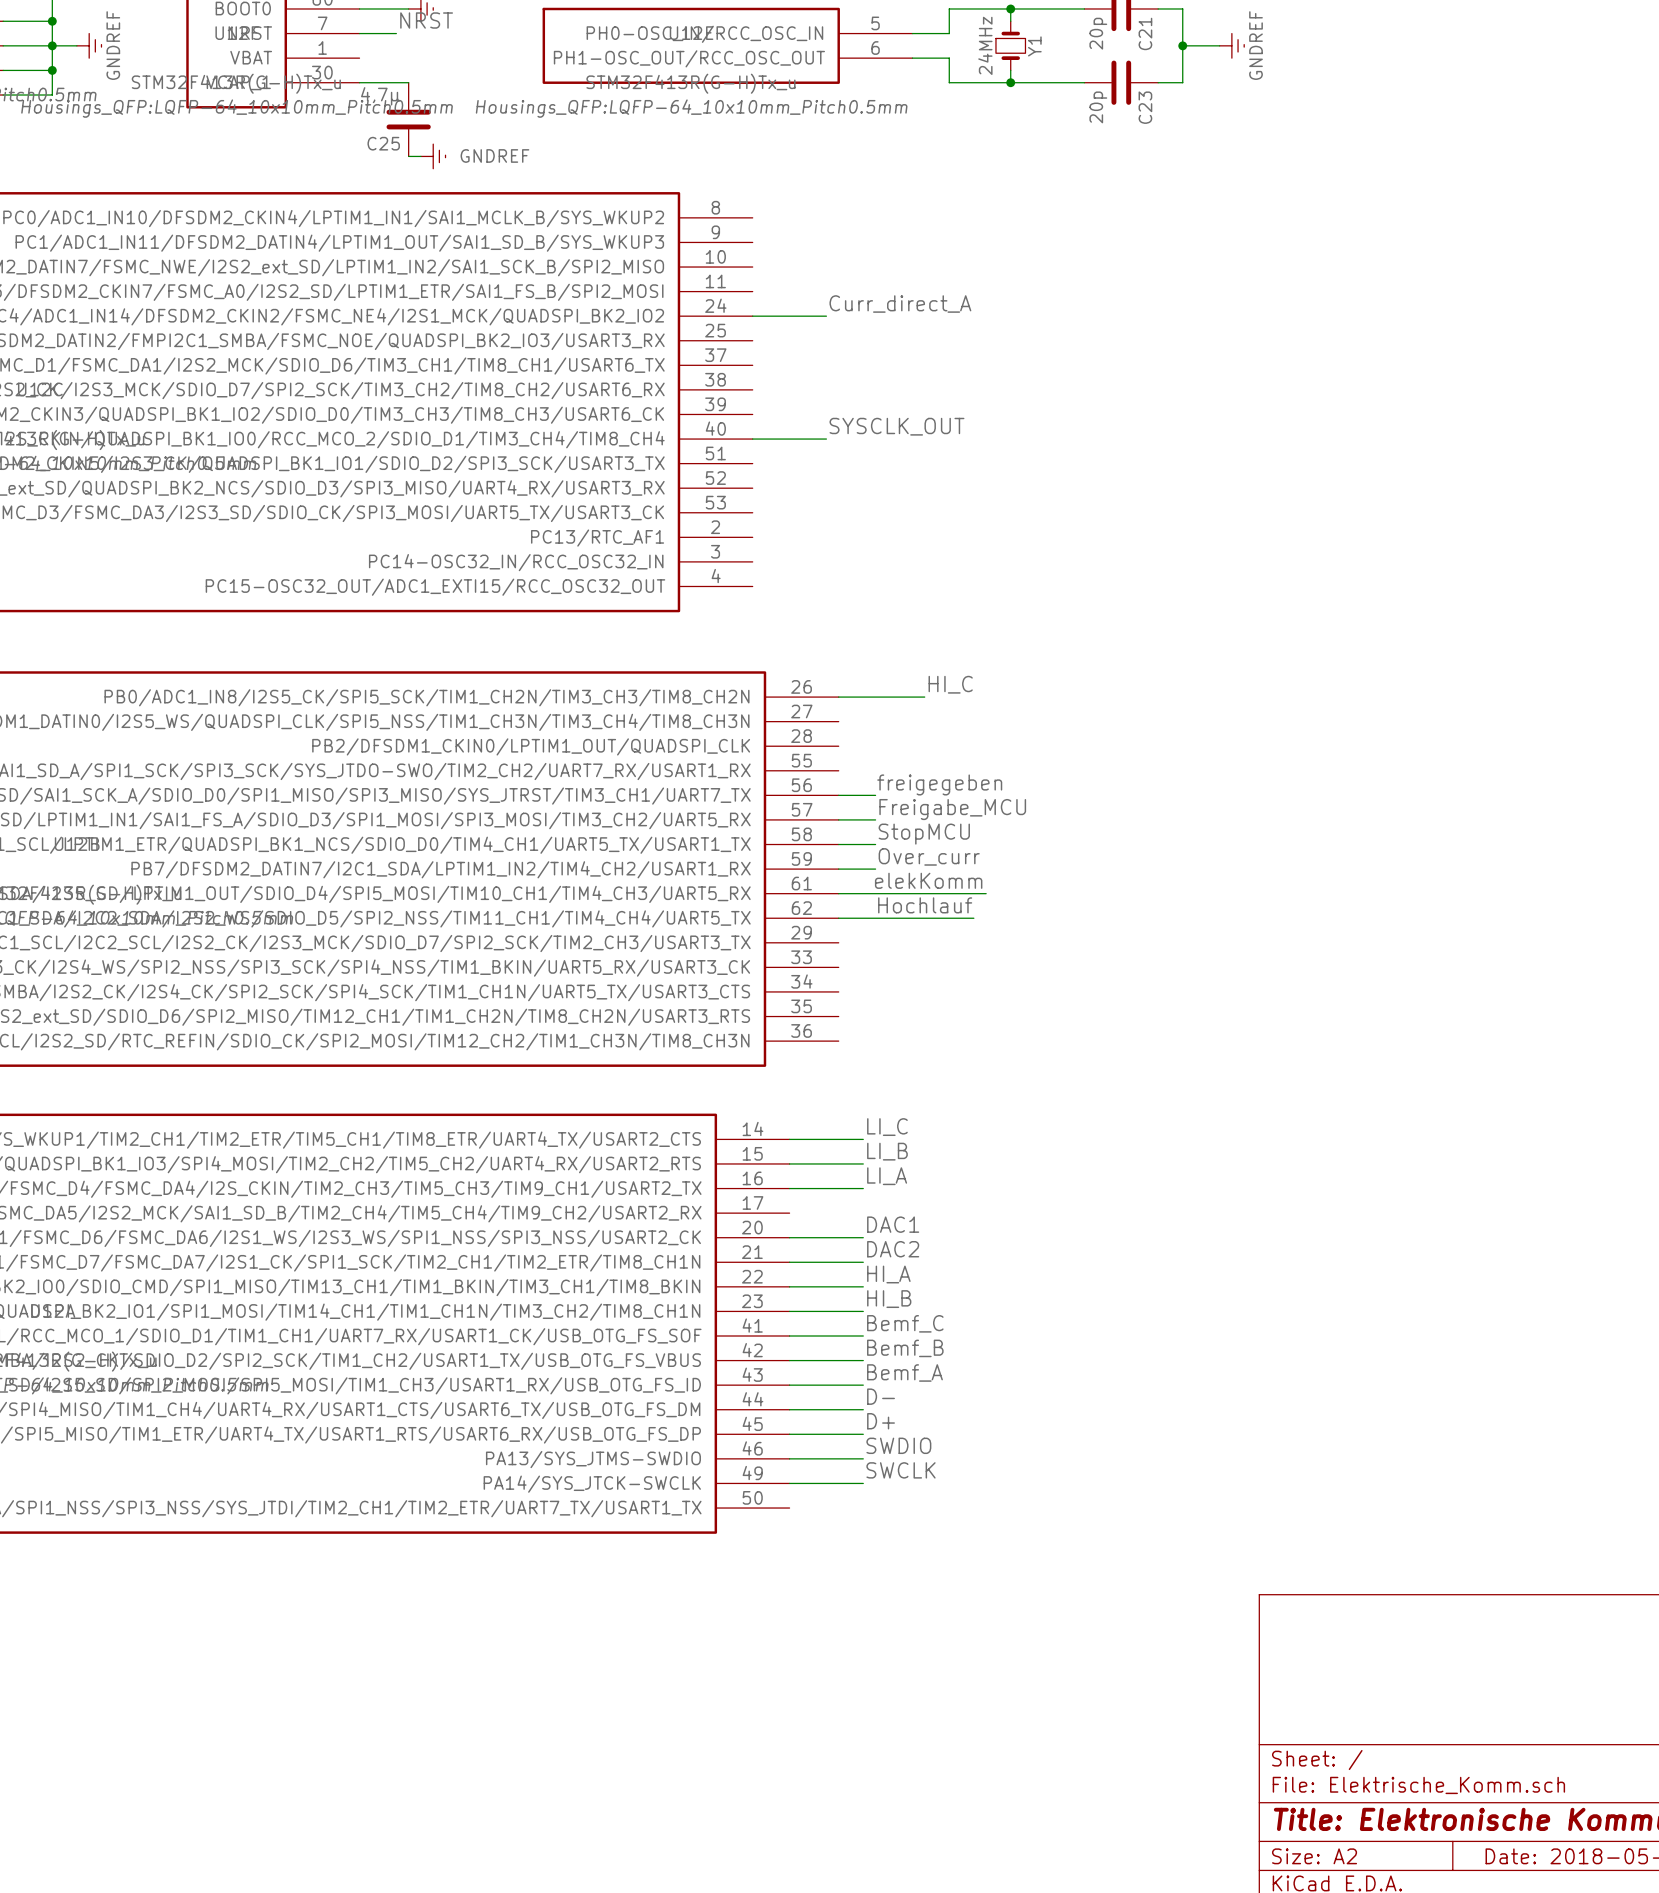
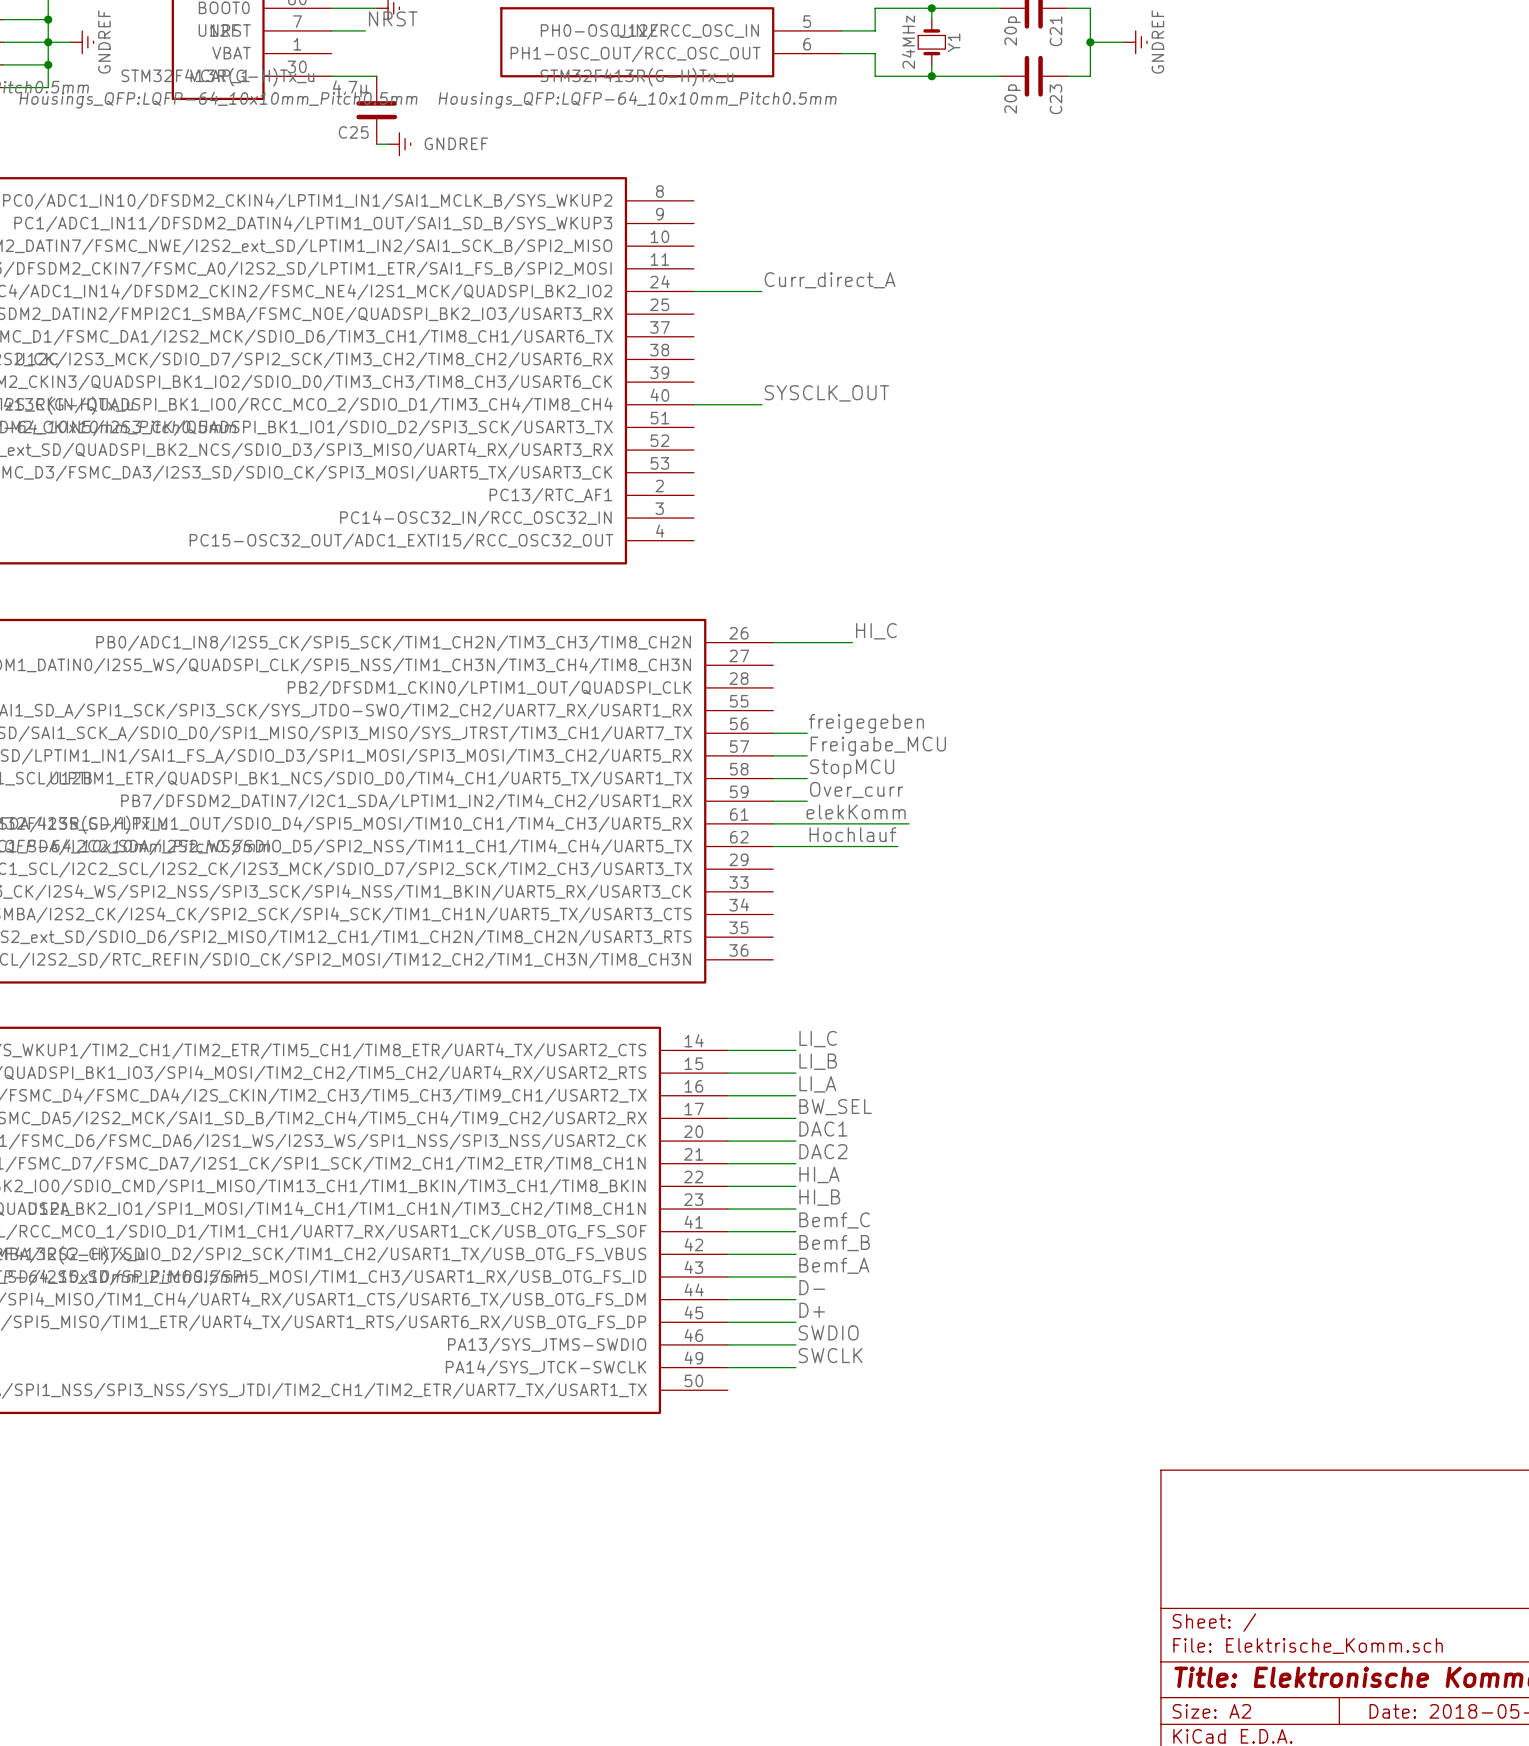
label: none -> BW_SEL (835, 1107)
wire: none -> (727, 1118) (795, 1118)

